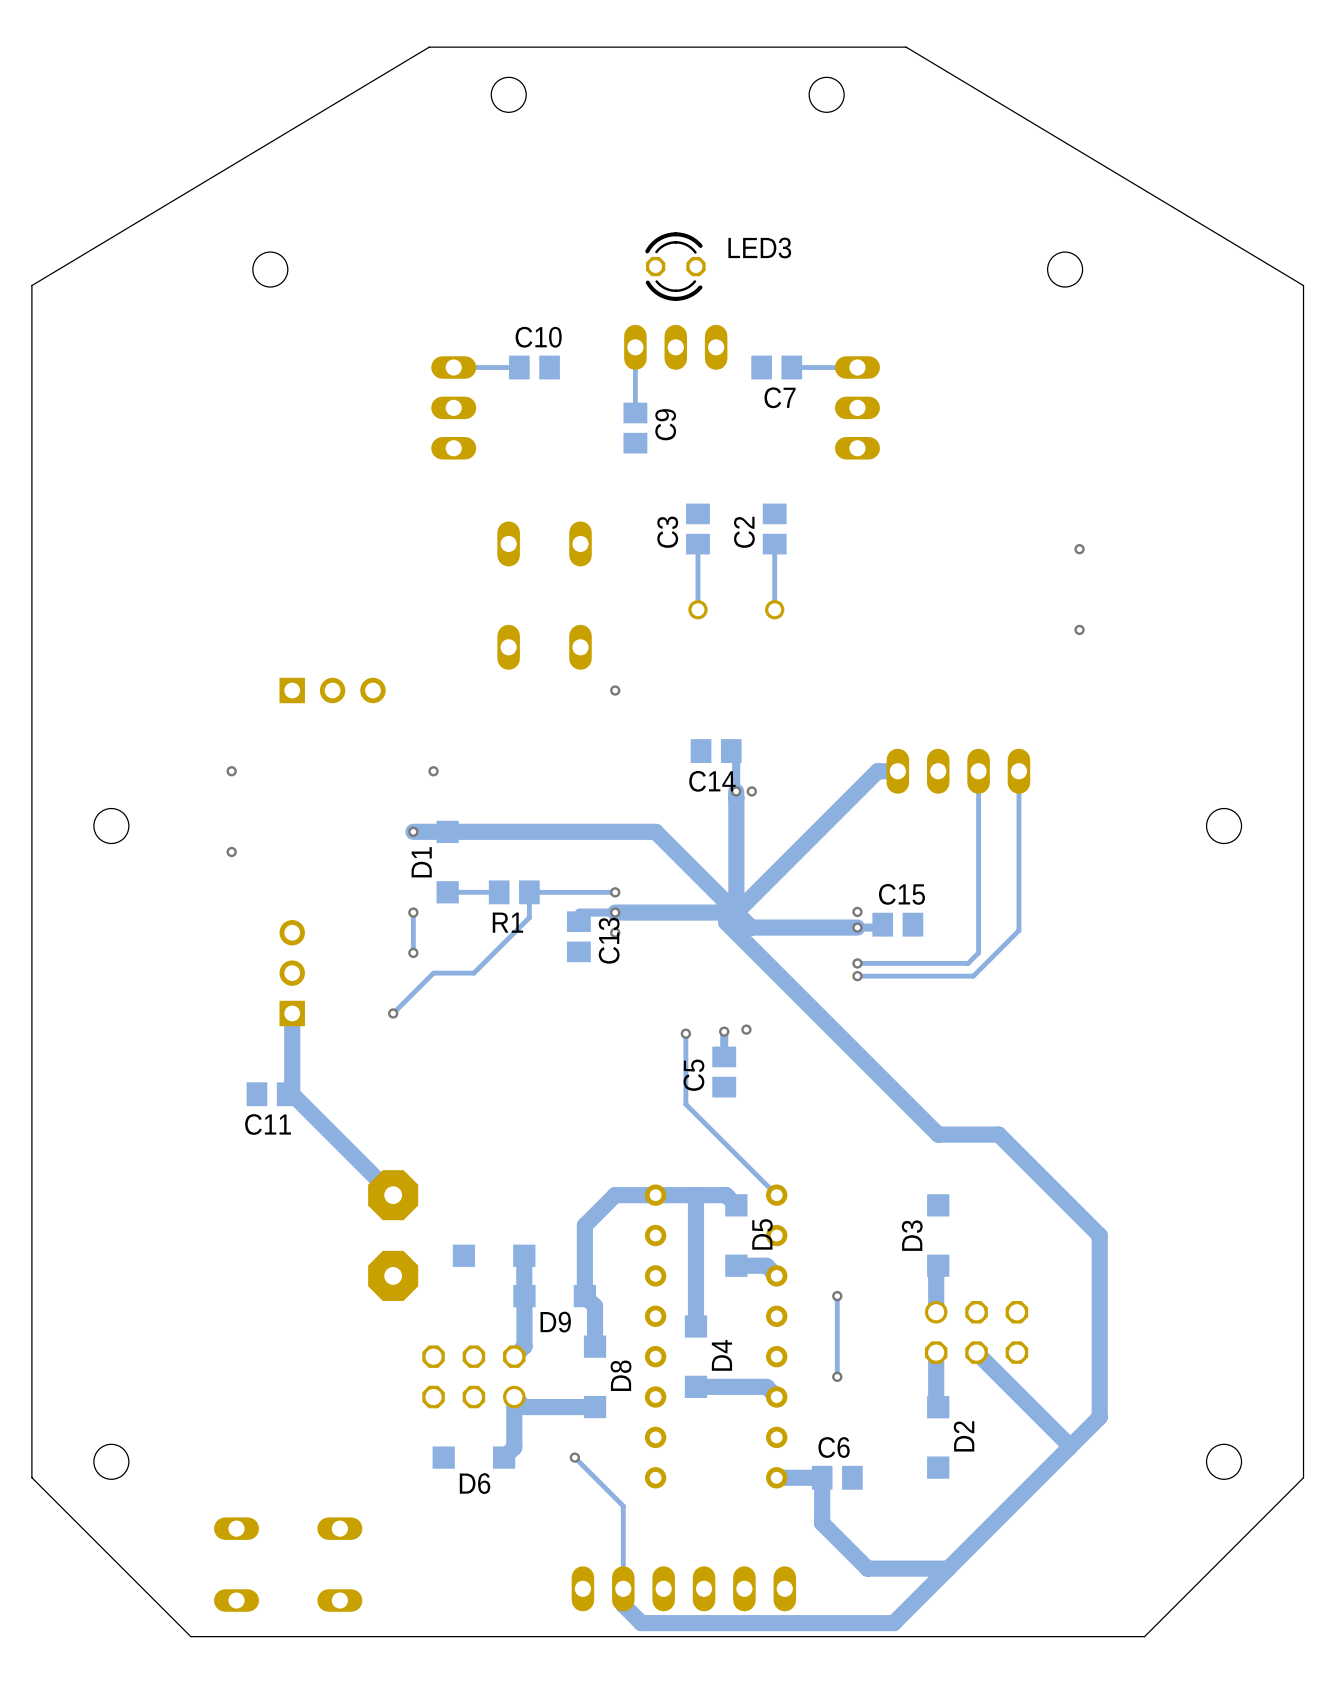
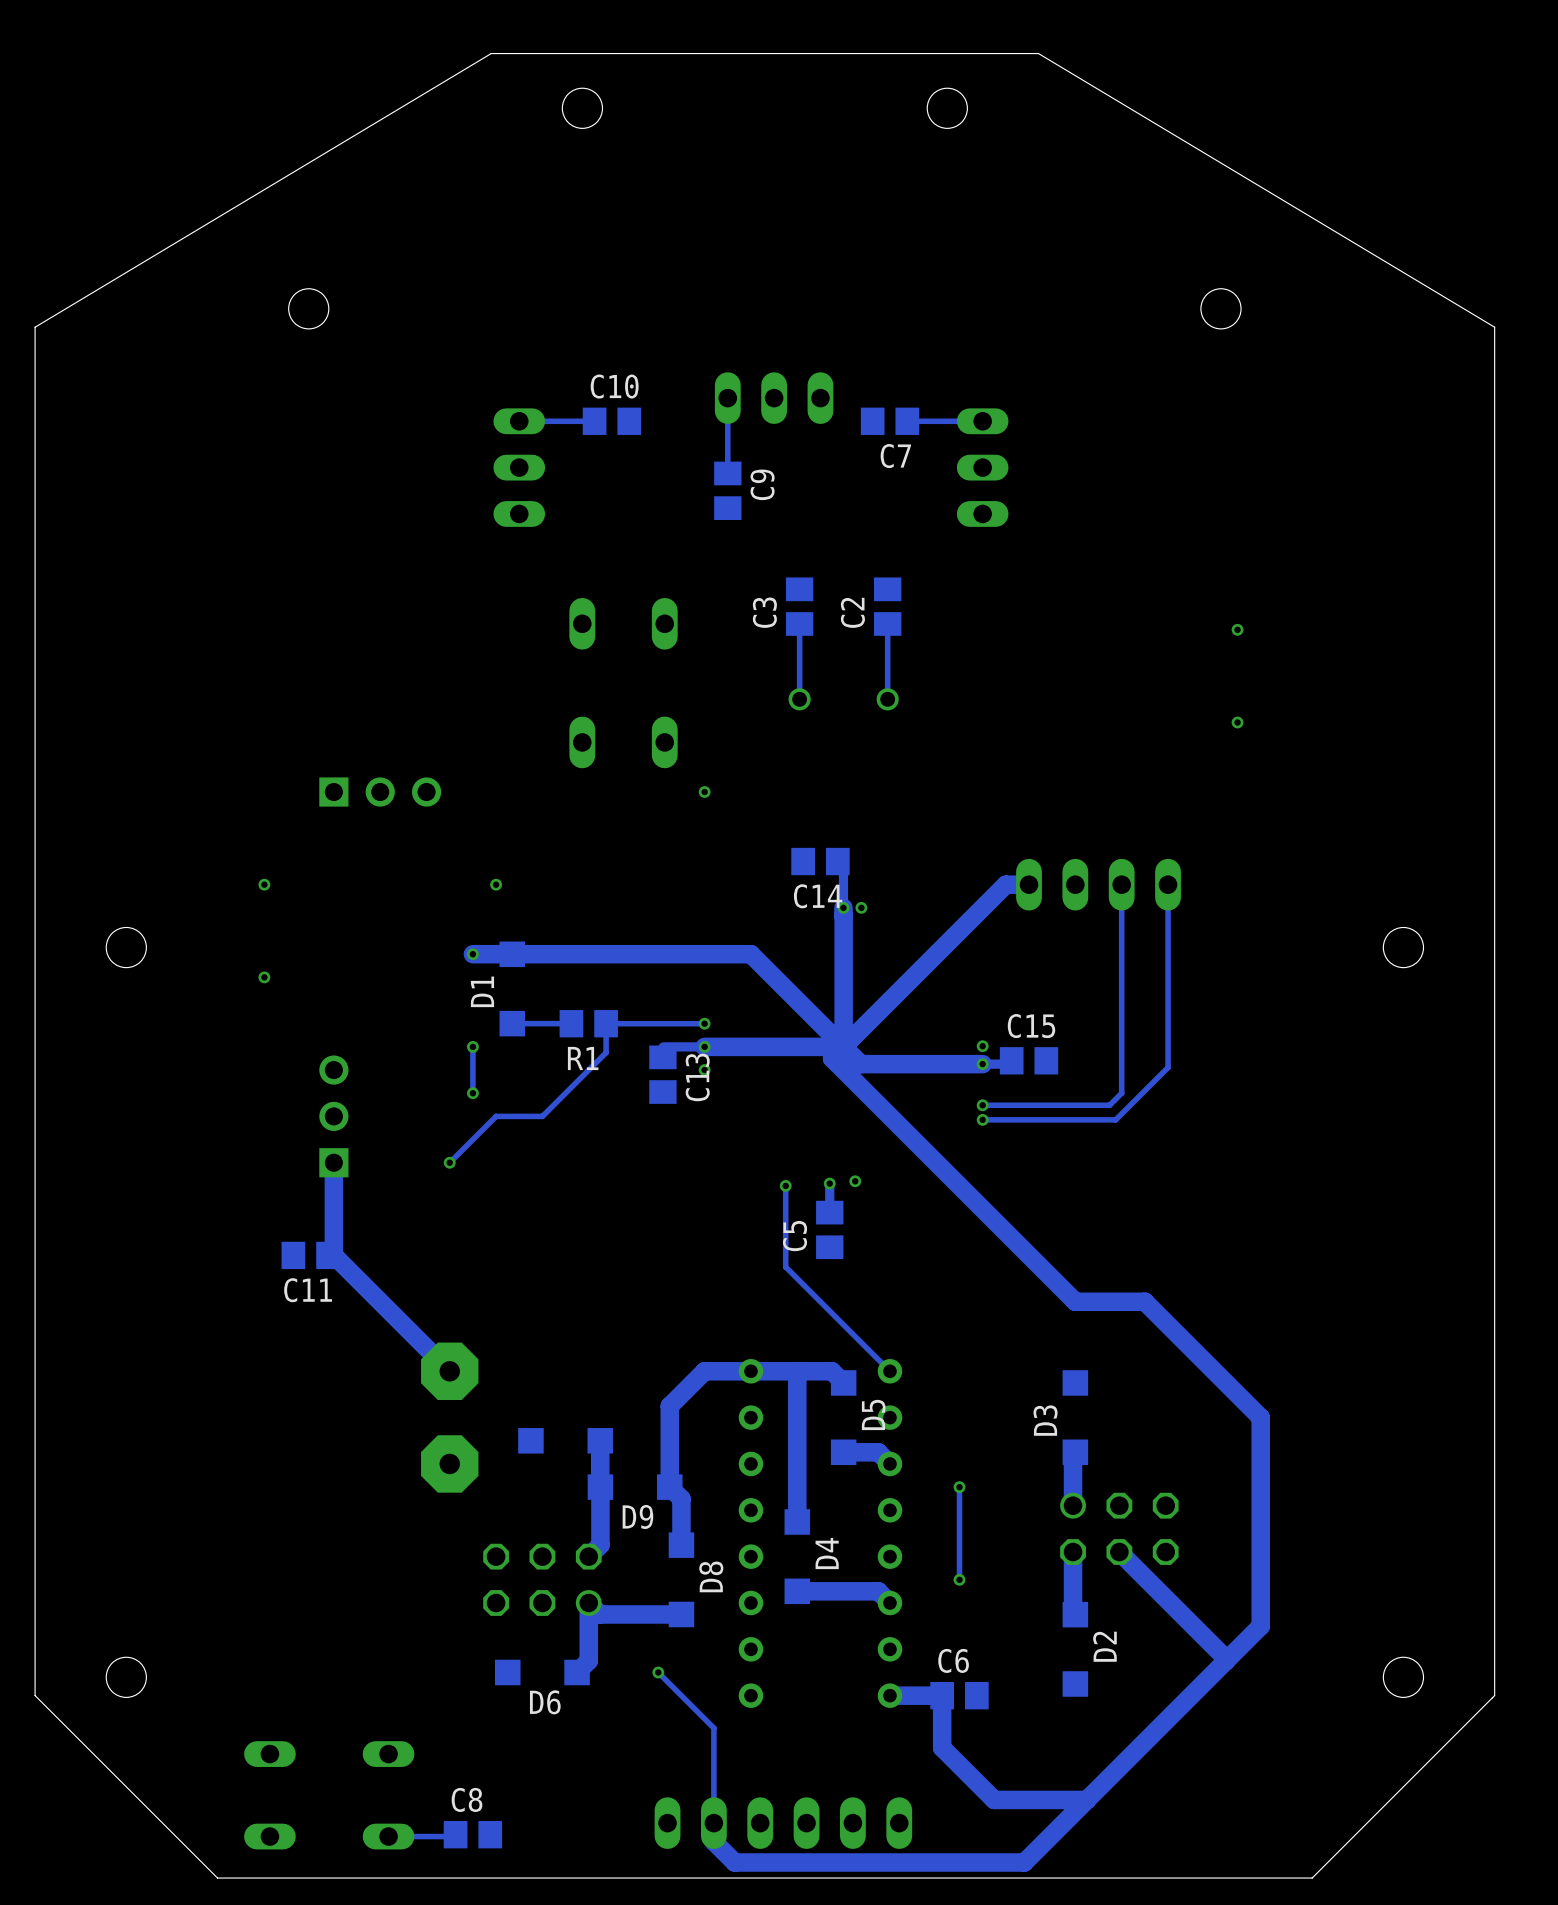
LED3: (675, 266) -> none
track: none -> (455, 1834) (453, 1836) (388, 1836)
C8: none -> (472, 1834)

